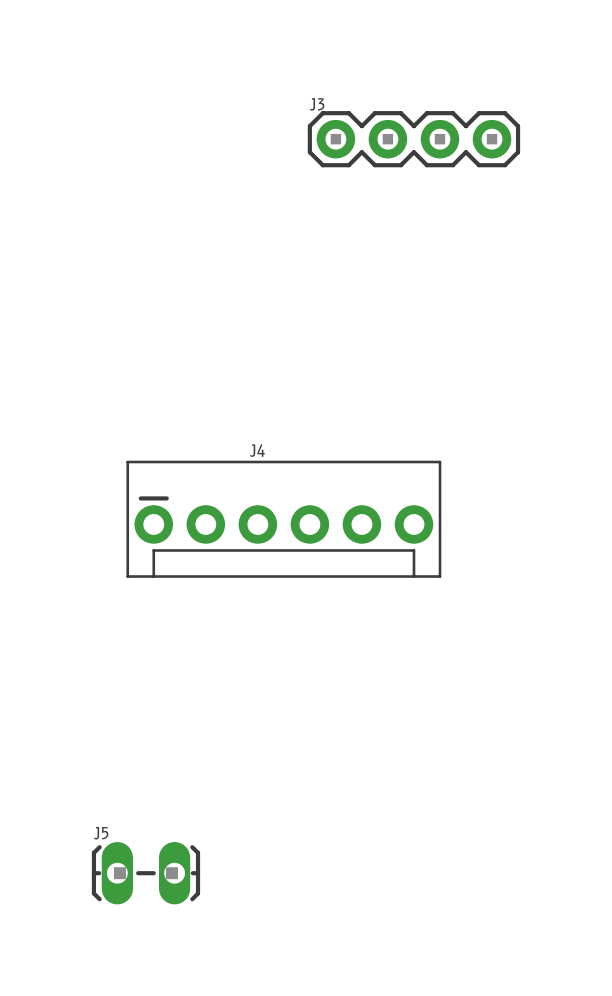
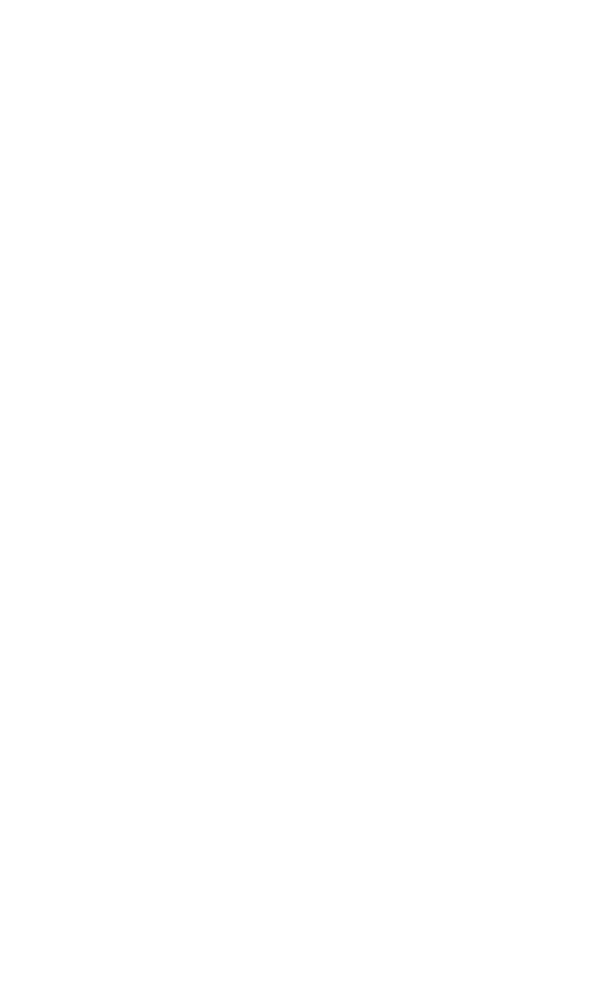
J3: (413, 139) -> none
J4: (283, 519) -> none
J5: (145, 873) -> none

